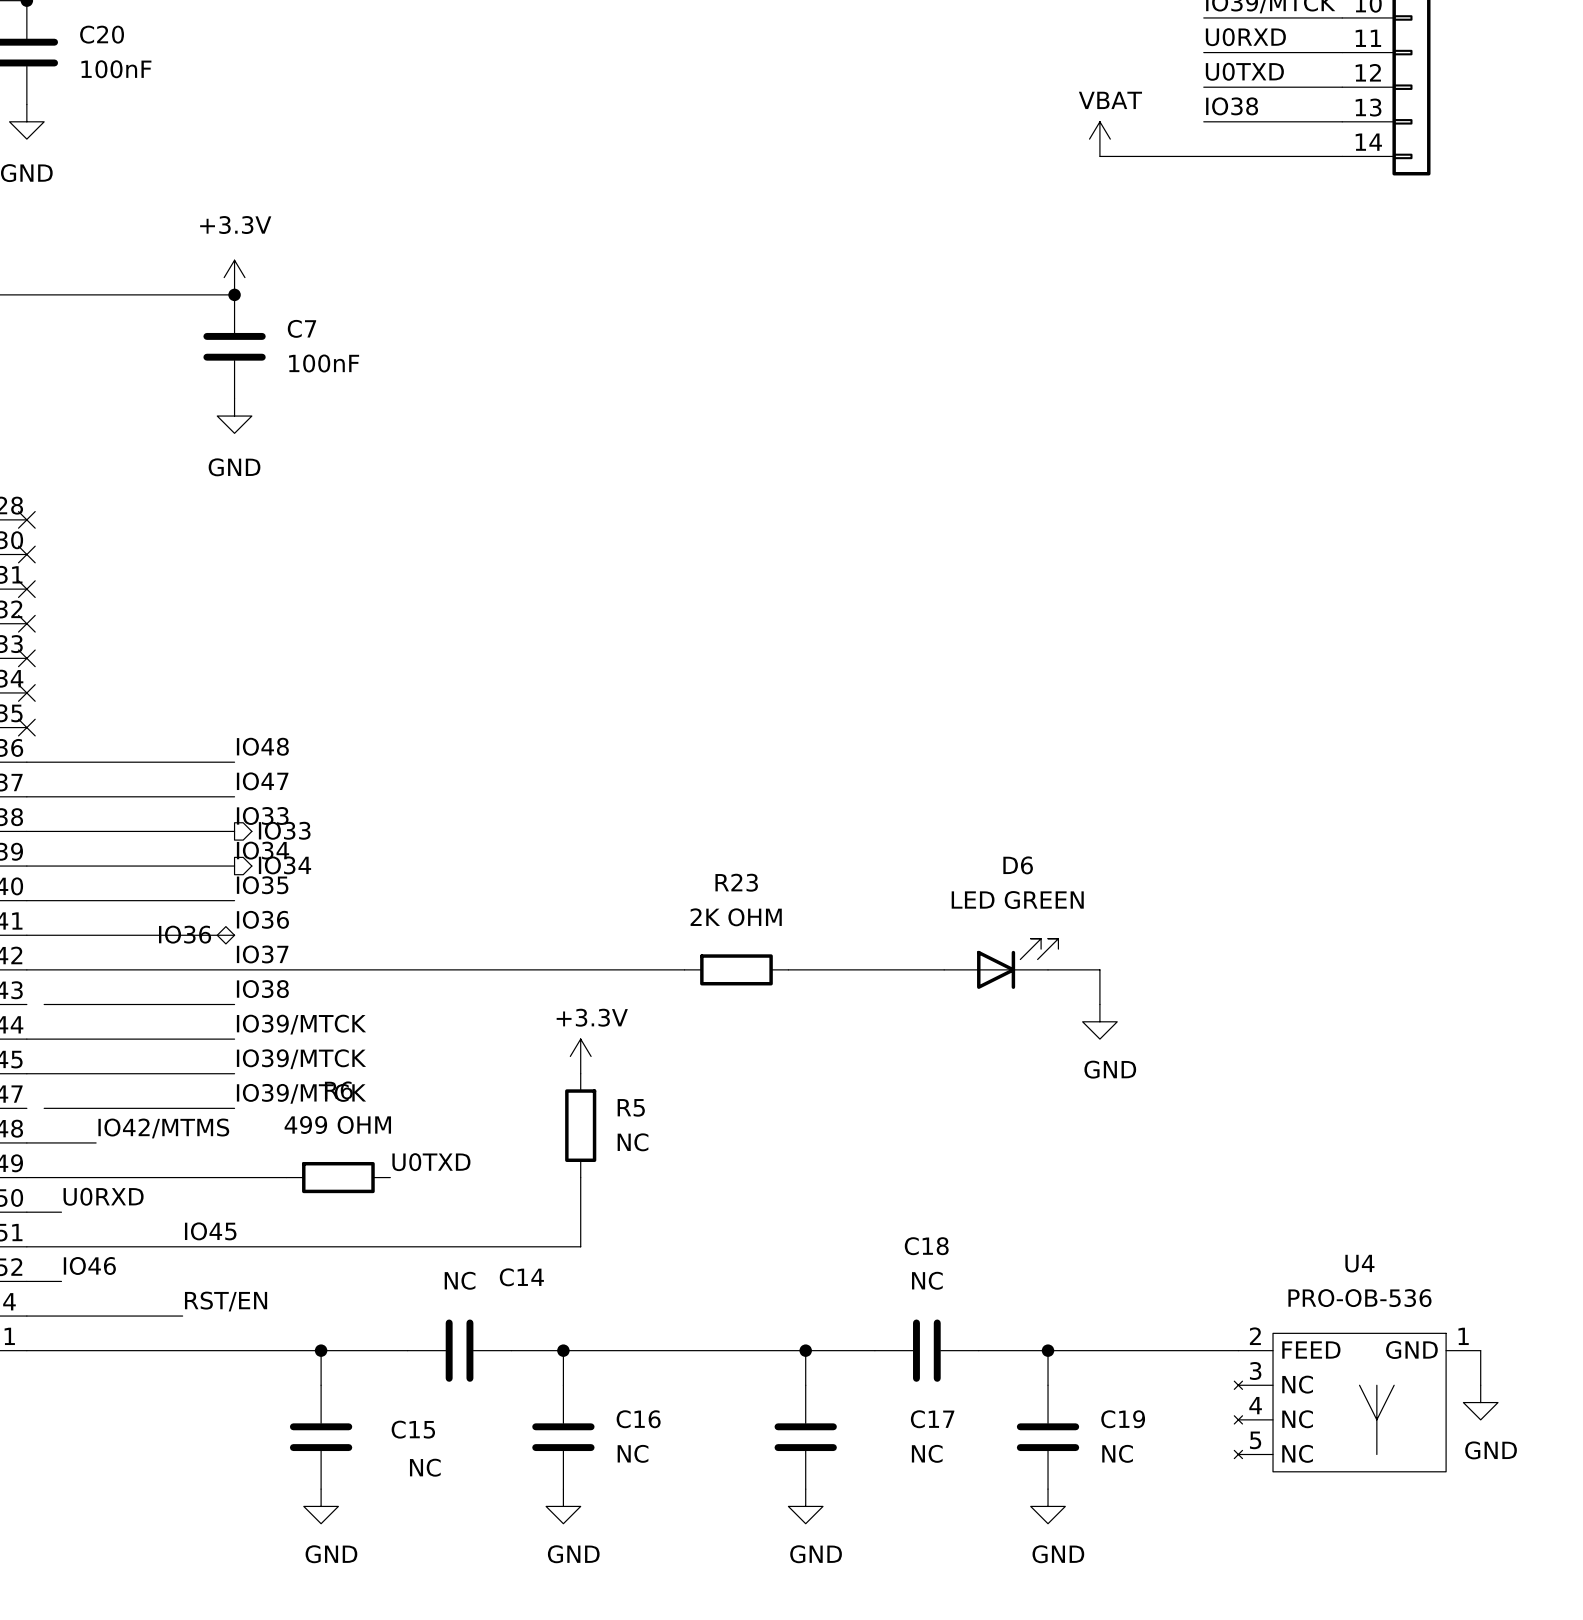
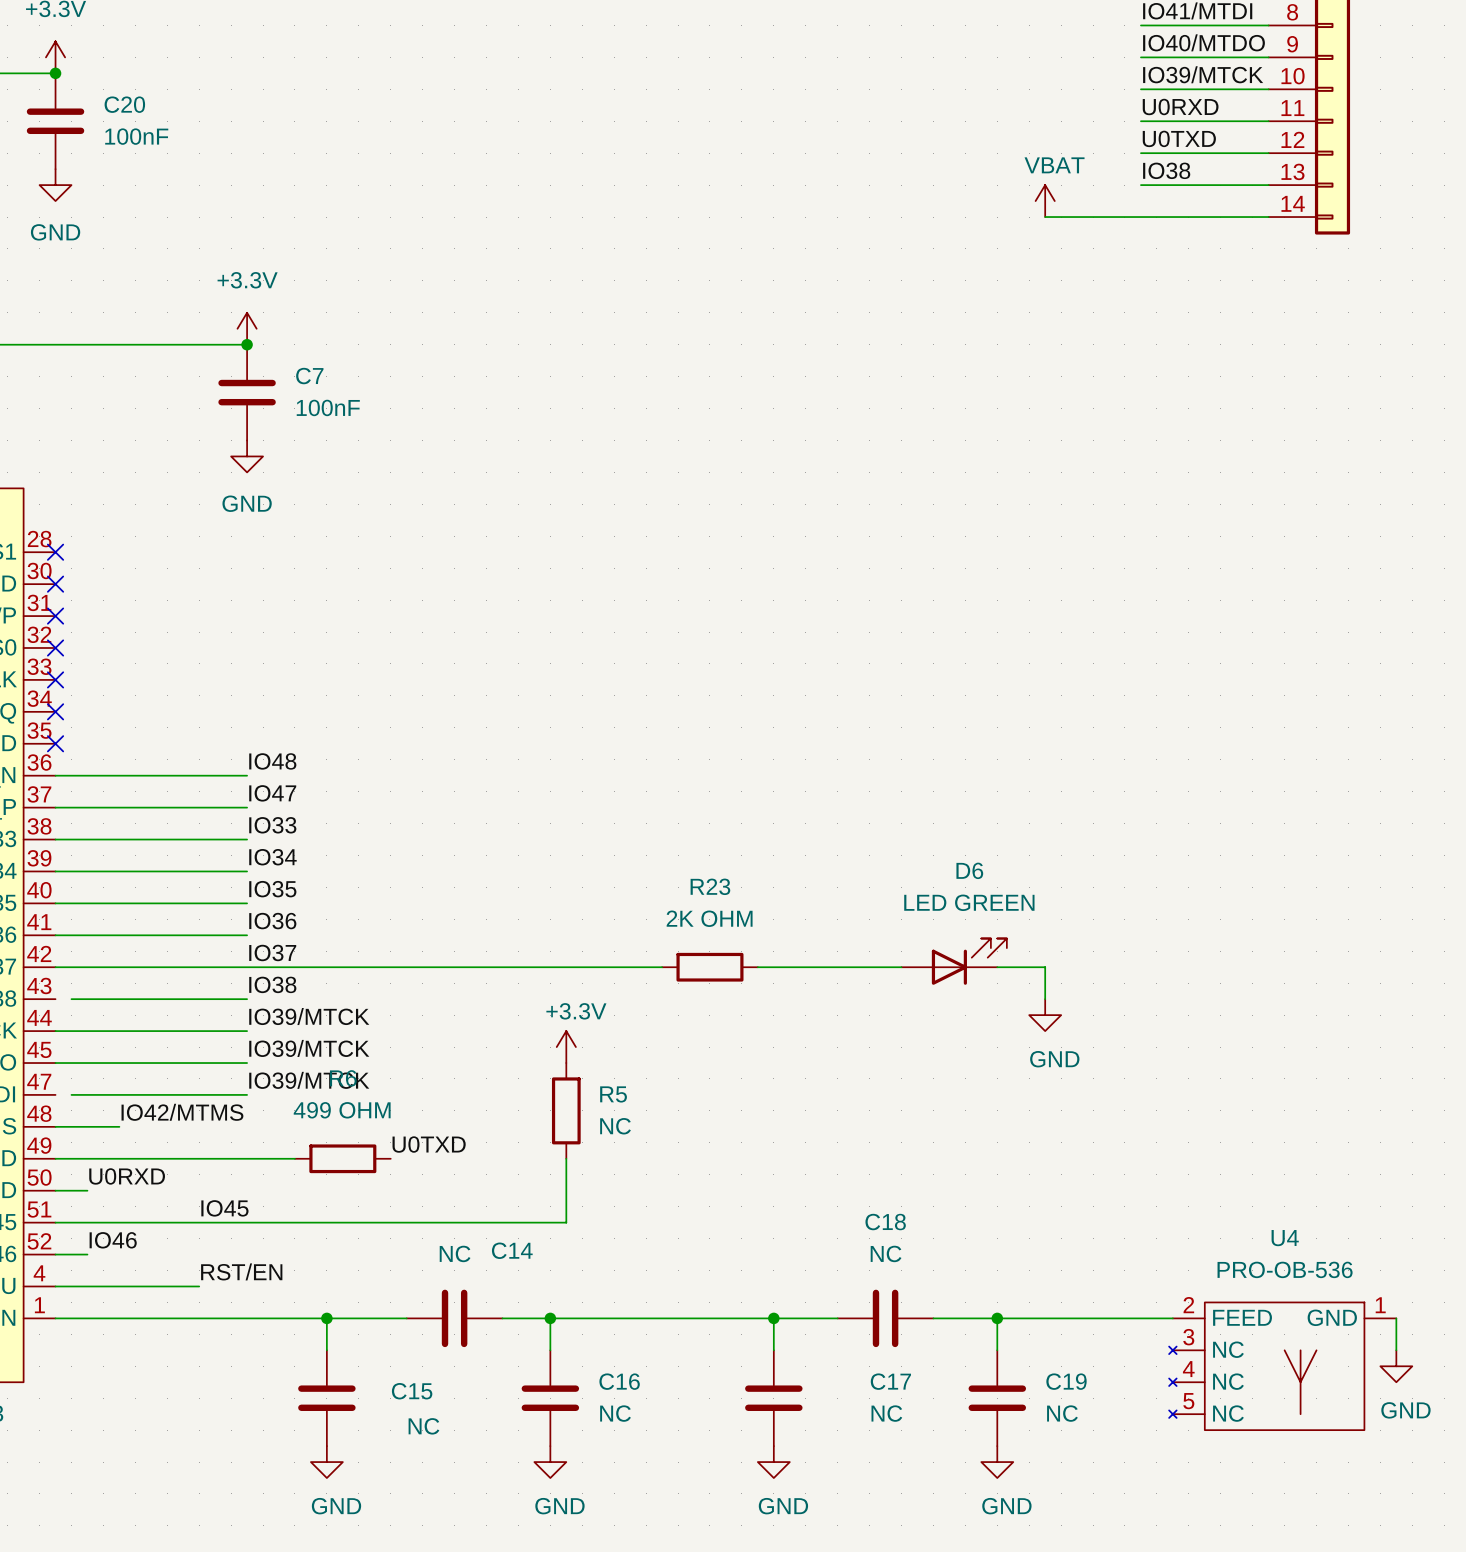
hierarchical label: IO33 (284, 830) -> none
hierarchical label: IO34 (284, 865) -> none
hierarchical label: IO36 (185, 934) -> none

